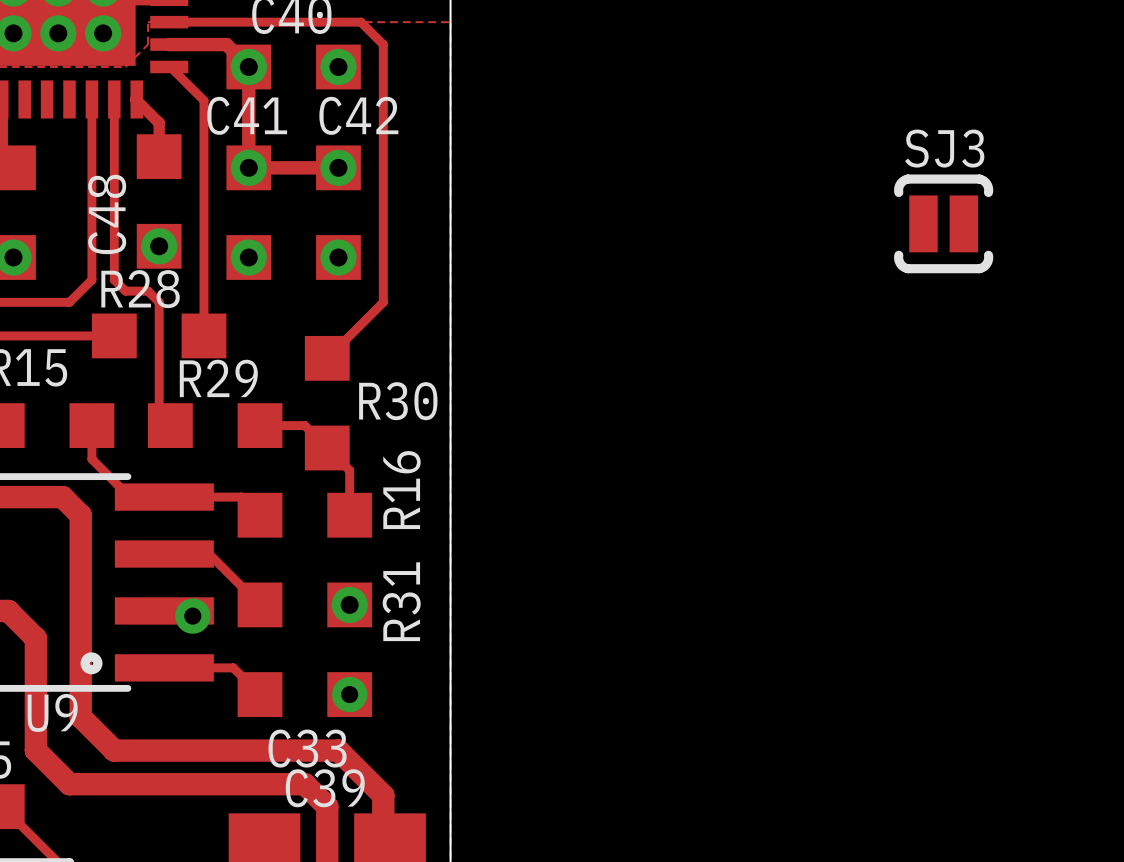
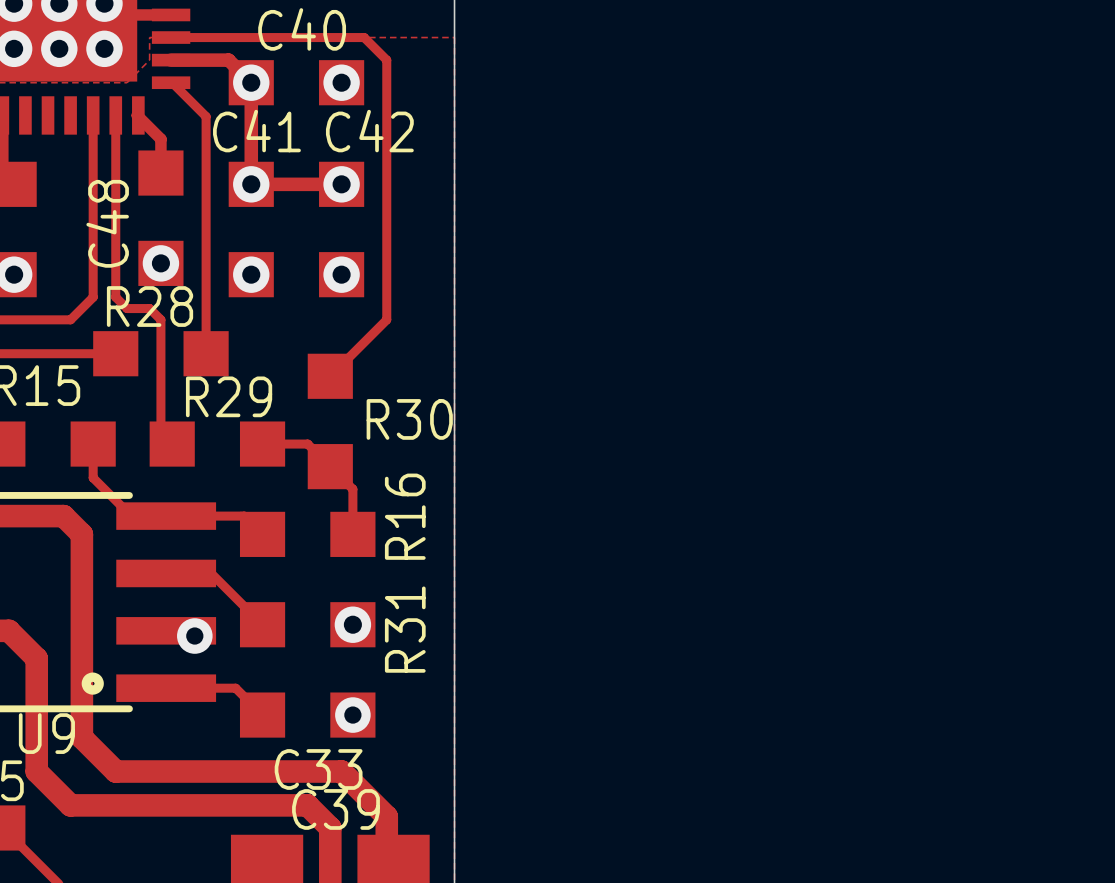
SJ3: (943, 223) -> none

